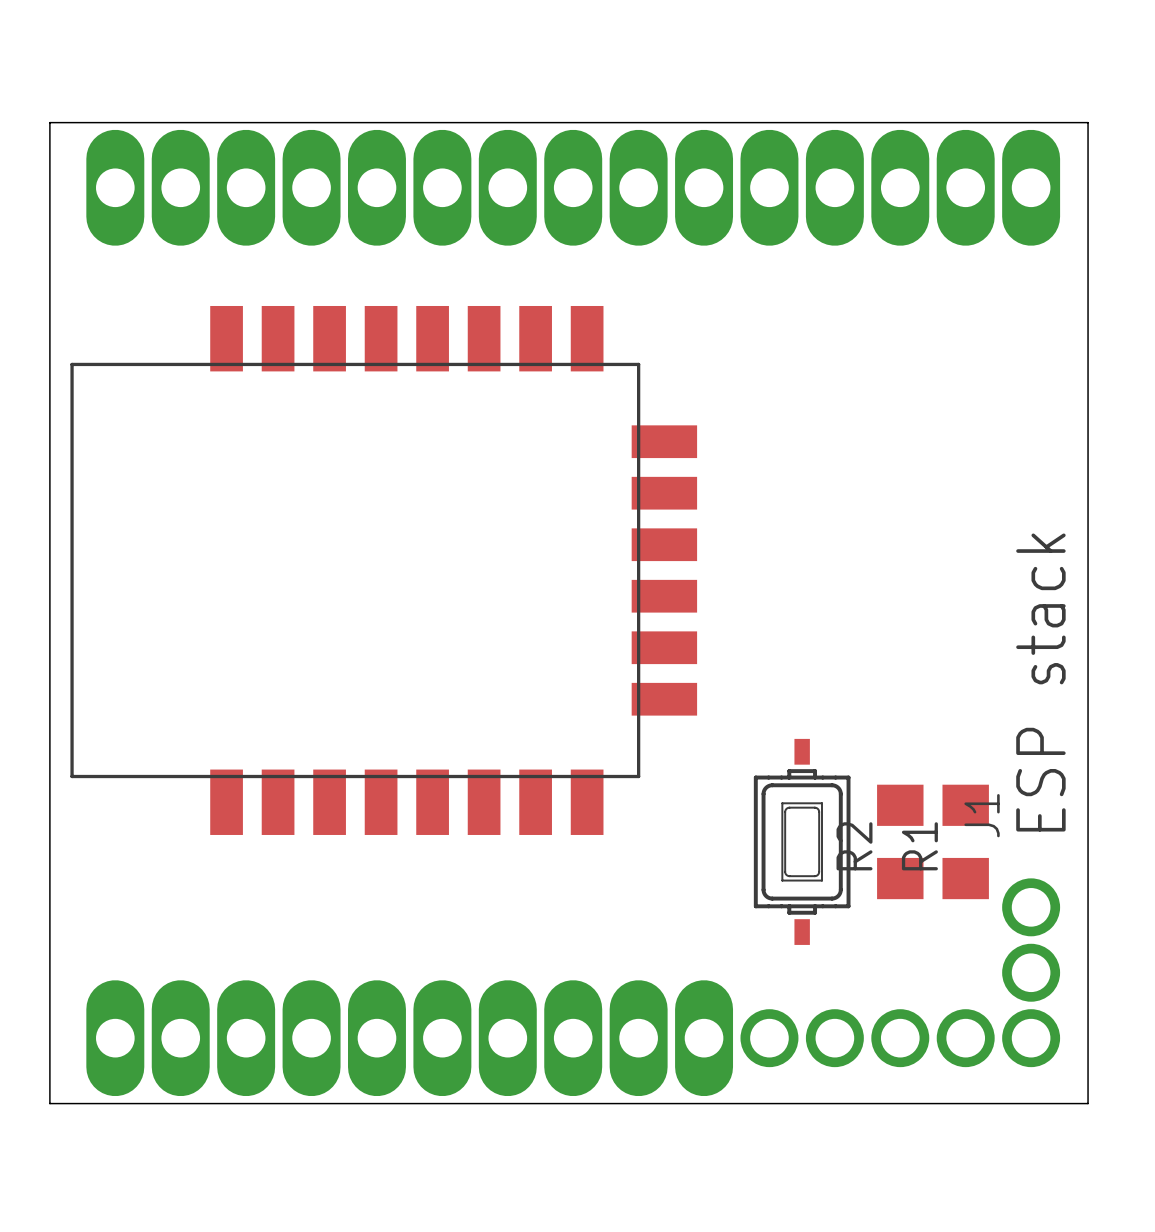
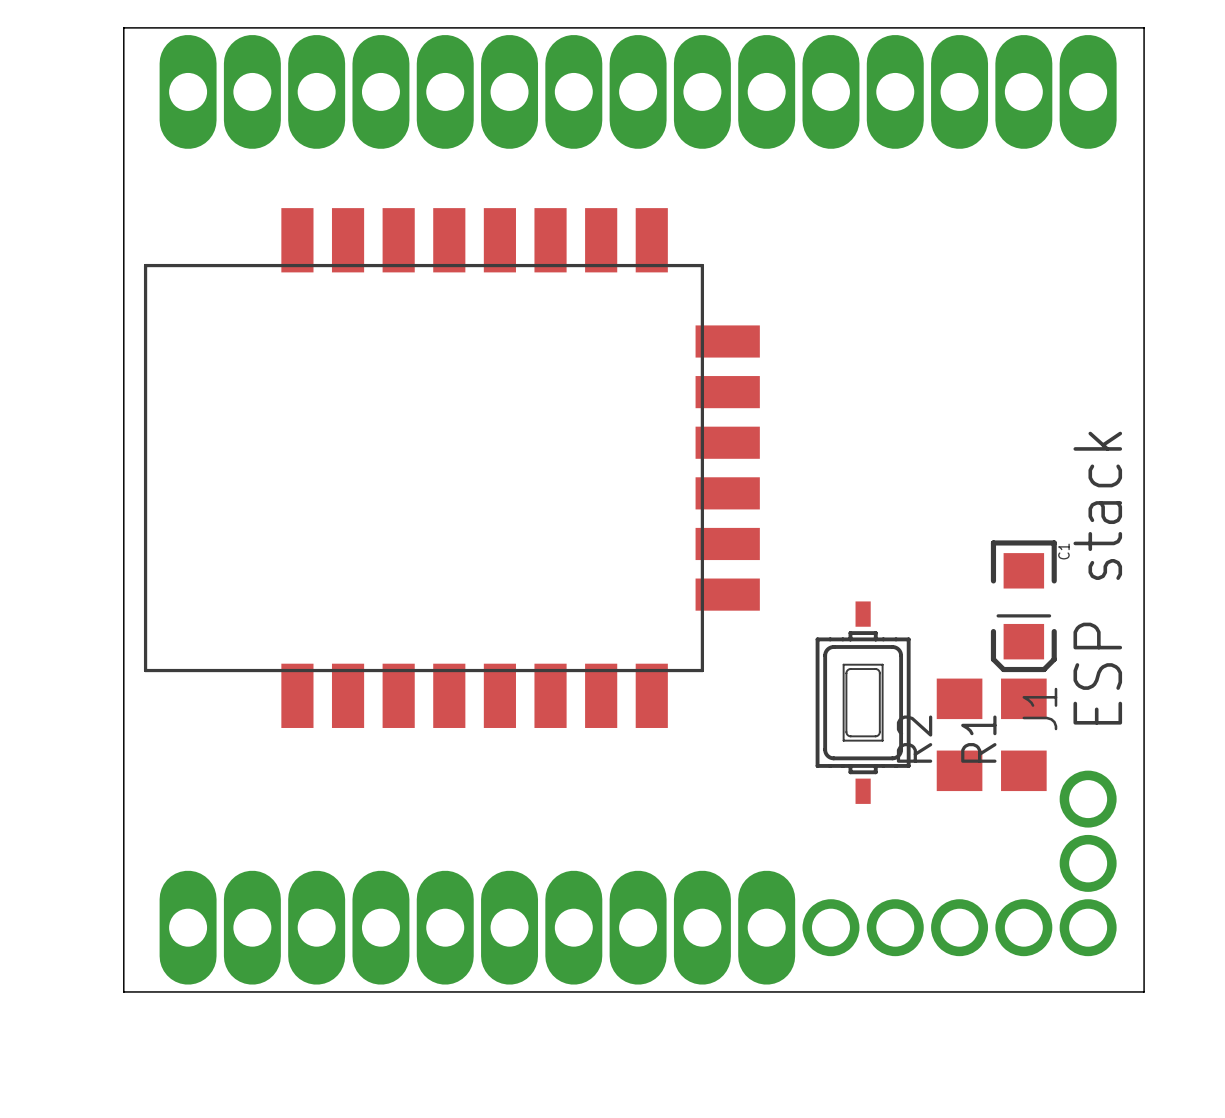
C1: none -> (1023, 606)
part position: (802, 841) -> (863, 702)

